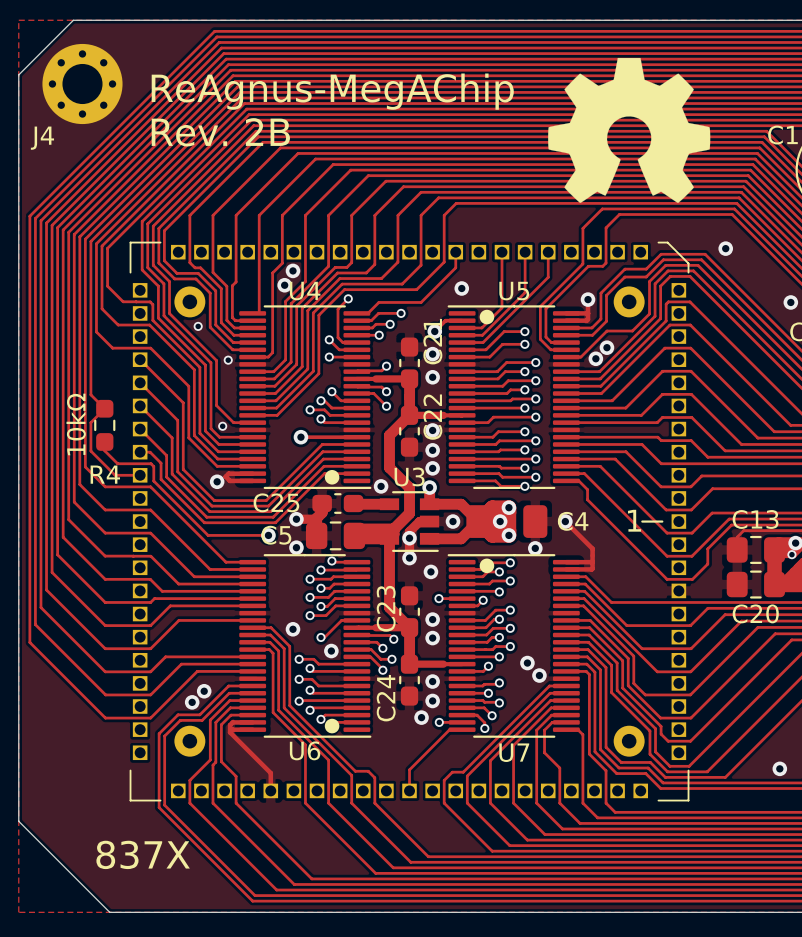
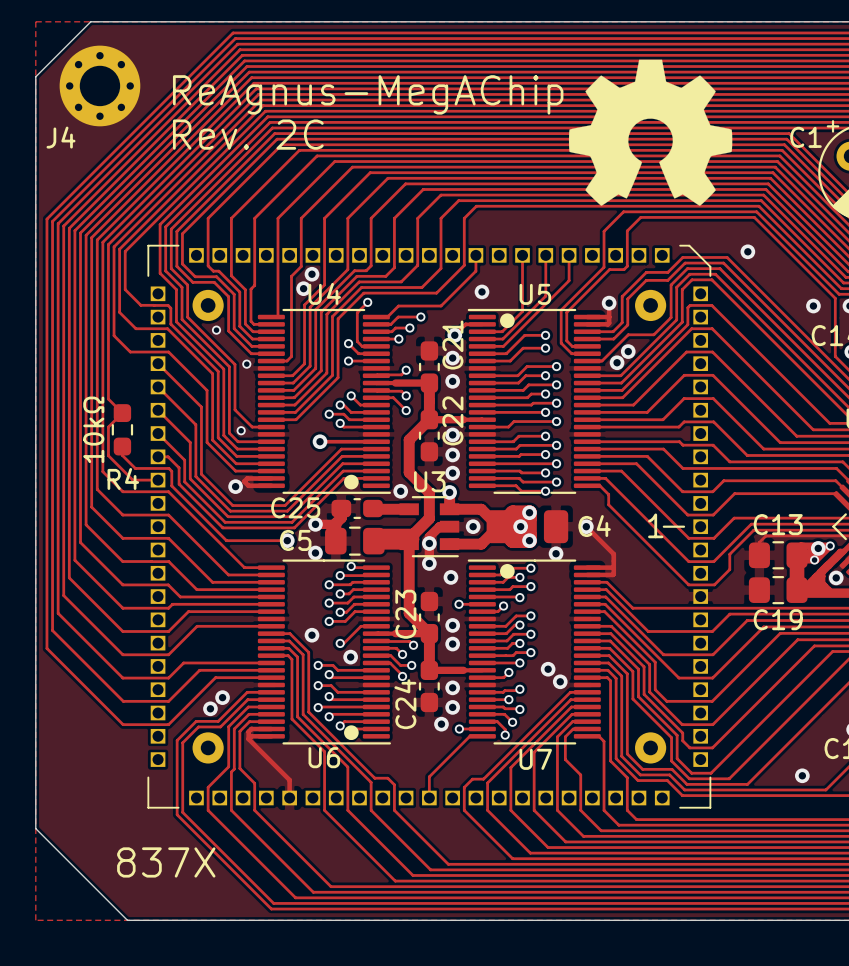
text: Rev. 2B (220, 132) -> Rev. 2C (248, 134)
C20 name: C20 (755, 613) -> C19 (778, 619)

